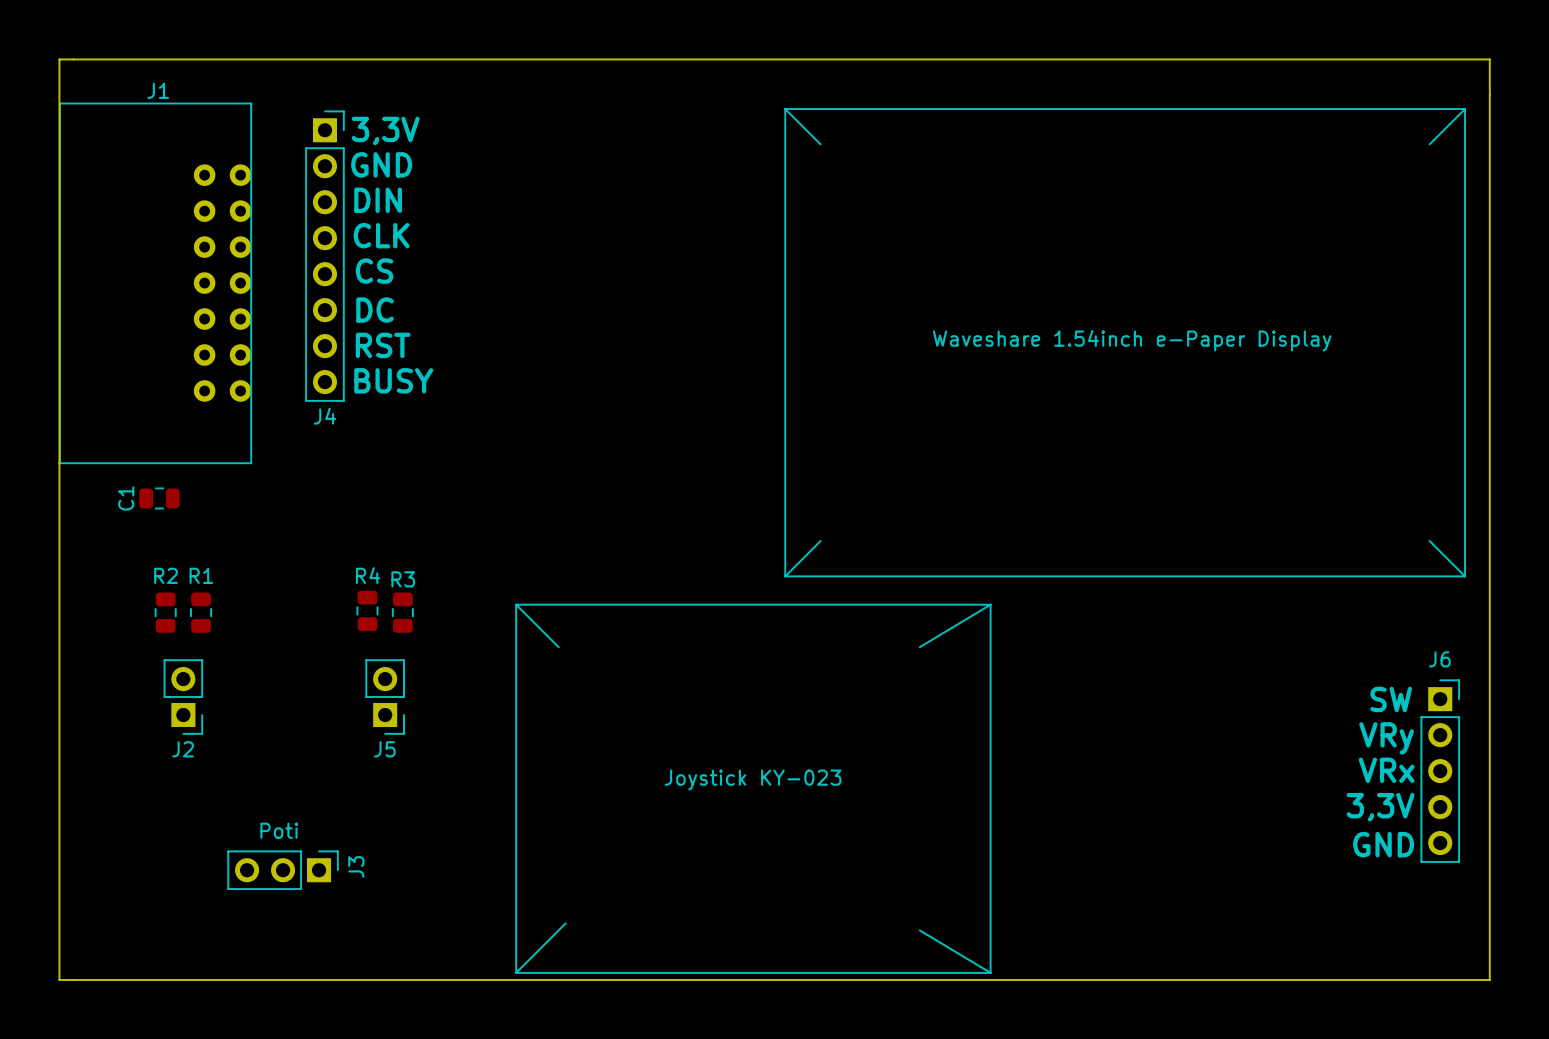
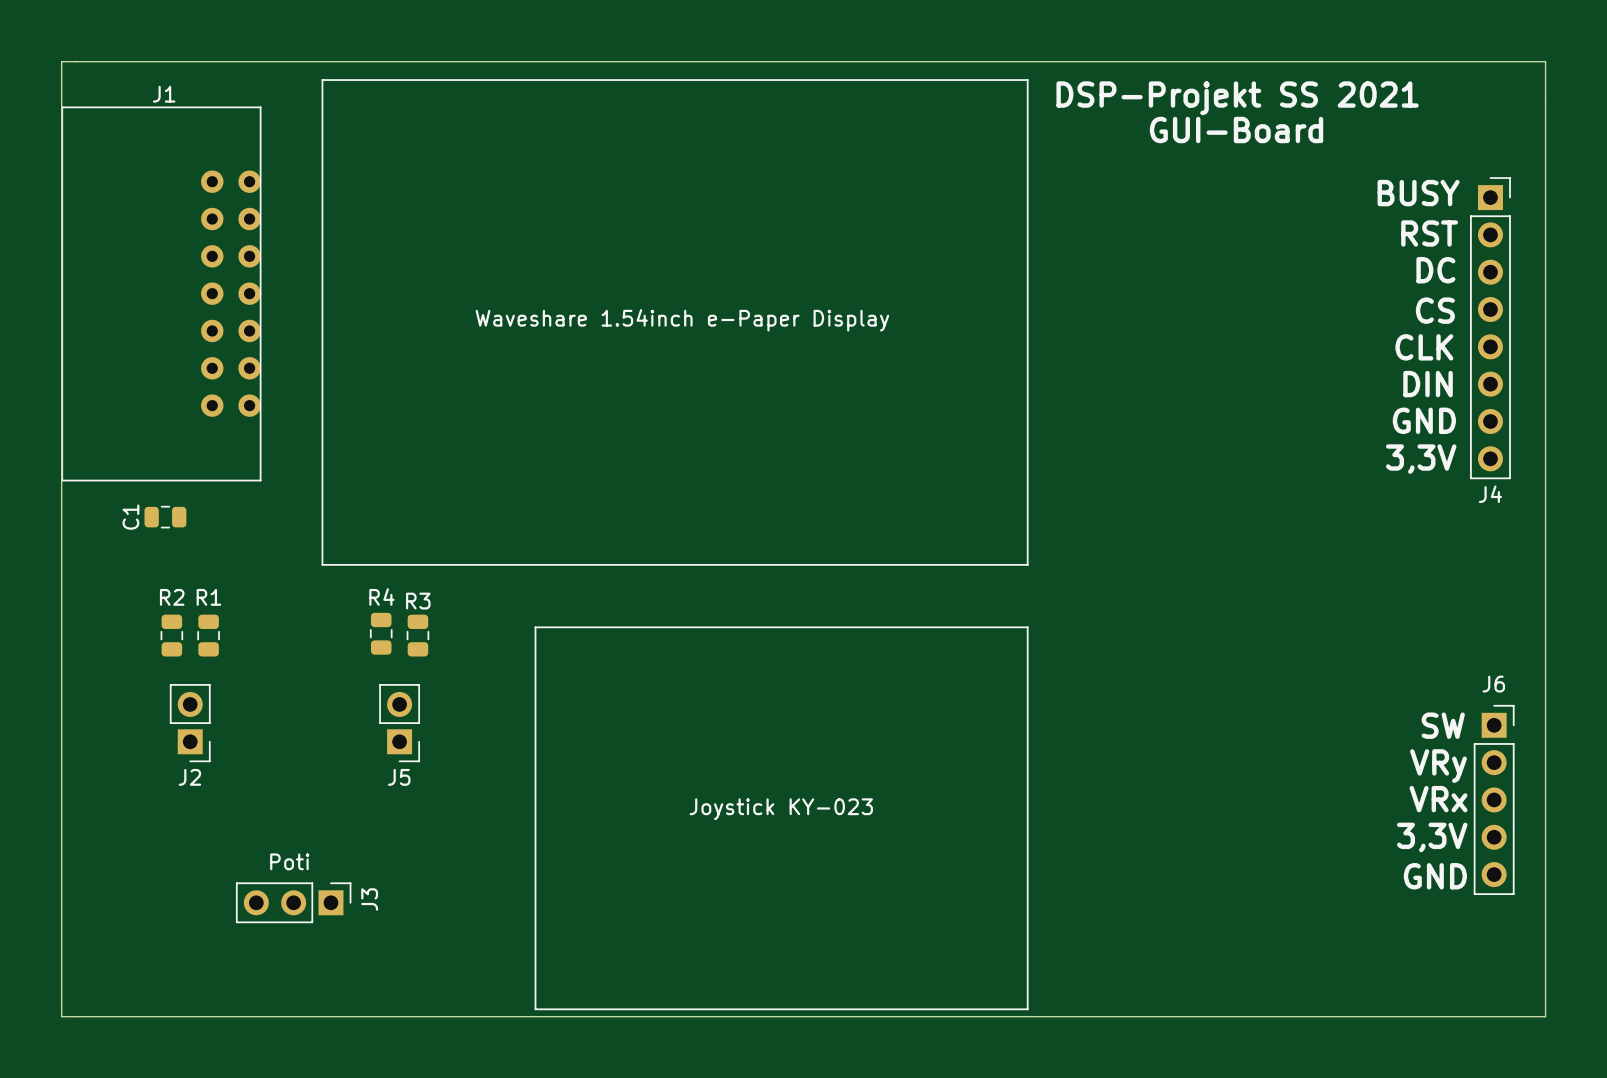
line: none -> (322, 80) (322, 564) (1027, 564) (1027, 80) (322, 80)
text: none -> DSP-Projekt SS 2021 (1237, 98)
line: (785, 109) (820, 144) -> none
line: (785, 109) (785, 576) -> none
line: (785, 109) (1465, 109) -> none
line: (1465, 109) (1429, 144) -> none
line: (1465, 109) (1465, 576) -> none
text: none -> GUI-Board (1236, 130)
text: 3,3V (385, 130) -> none
text: GND (381, 164) -> none
text: none -> BUSY (1418, 193)
text: DIN (378, 200) -> none
text: none -> RST (1429, 233)
text: CLK (381, 235) -> none
J4 position: (324, 256) -> (1490, 328)
text: none -> DC (1435, 270)
text: CS (374, 271) -> none
text: none -> CS (1435, 310)
text: none -> Waveshare 1.54inch e-Paper Display (682, 320)
text: DC (375, 310) -> none
text: none -> CLK (1424, 347)
text: Waveshare 1.54inch e-Paper Display (1132, 340) -> none
text: RST (383, 345) -> none
text: none -> DIN (1428, 384)
text: BUSY (393, 380) -> none
text: none -> GND (1424, 420)
text: none -> 3,3V (1421, 459)
line: (820, 540) (785, 576) -> none
line: (1429, 540) (1465, 576) -> none
line: (785, 576) (1465, 576) -> none
line: (516, 604) (558, 647) -> none
line: (990, 604) (919, 647) -> none
line: (565, 923) (516, 972) -> none
line: (919, 930) (990, 972) -> none

